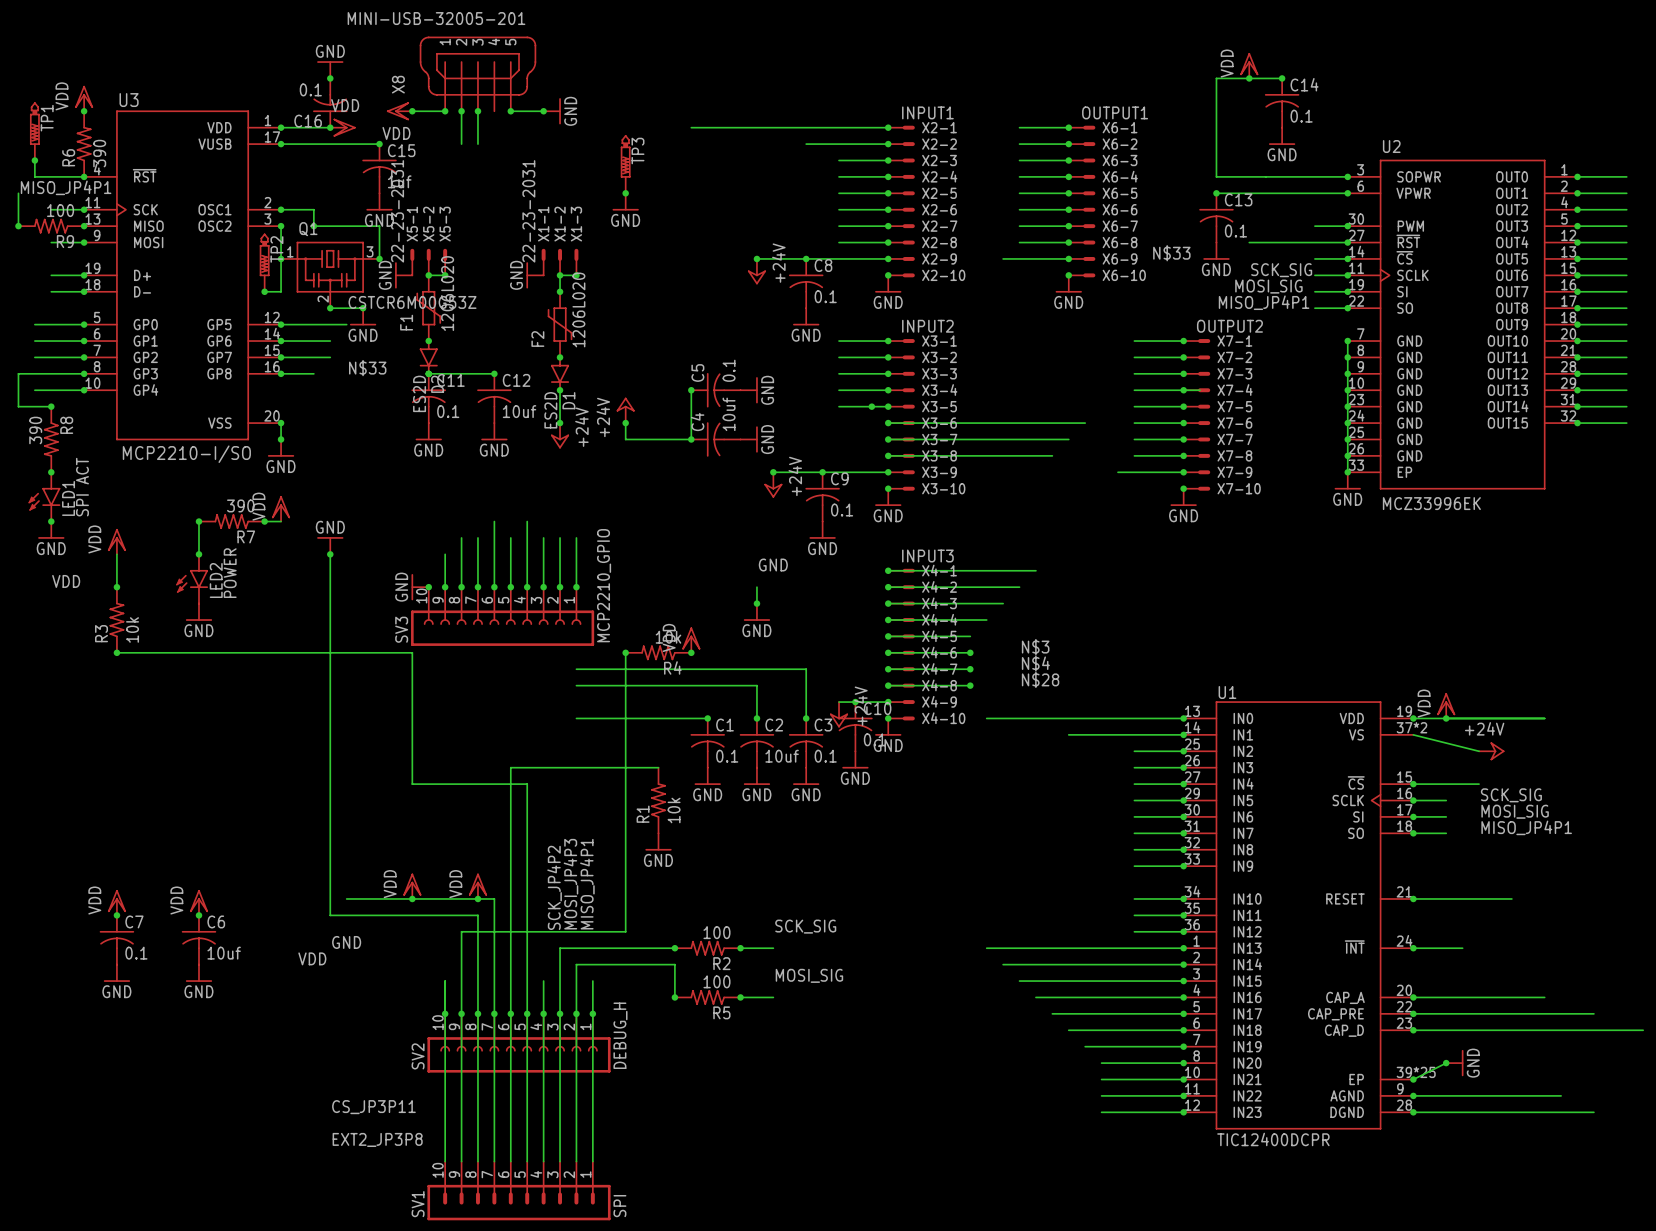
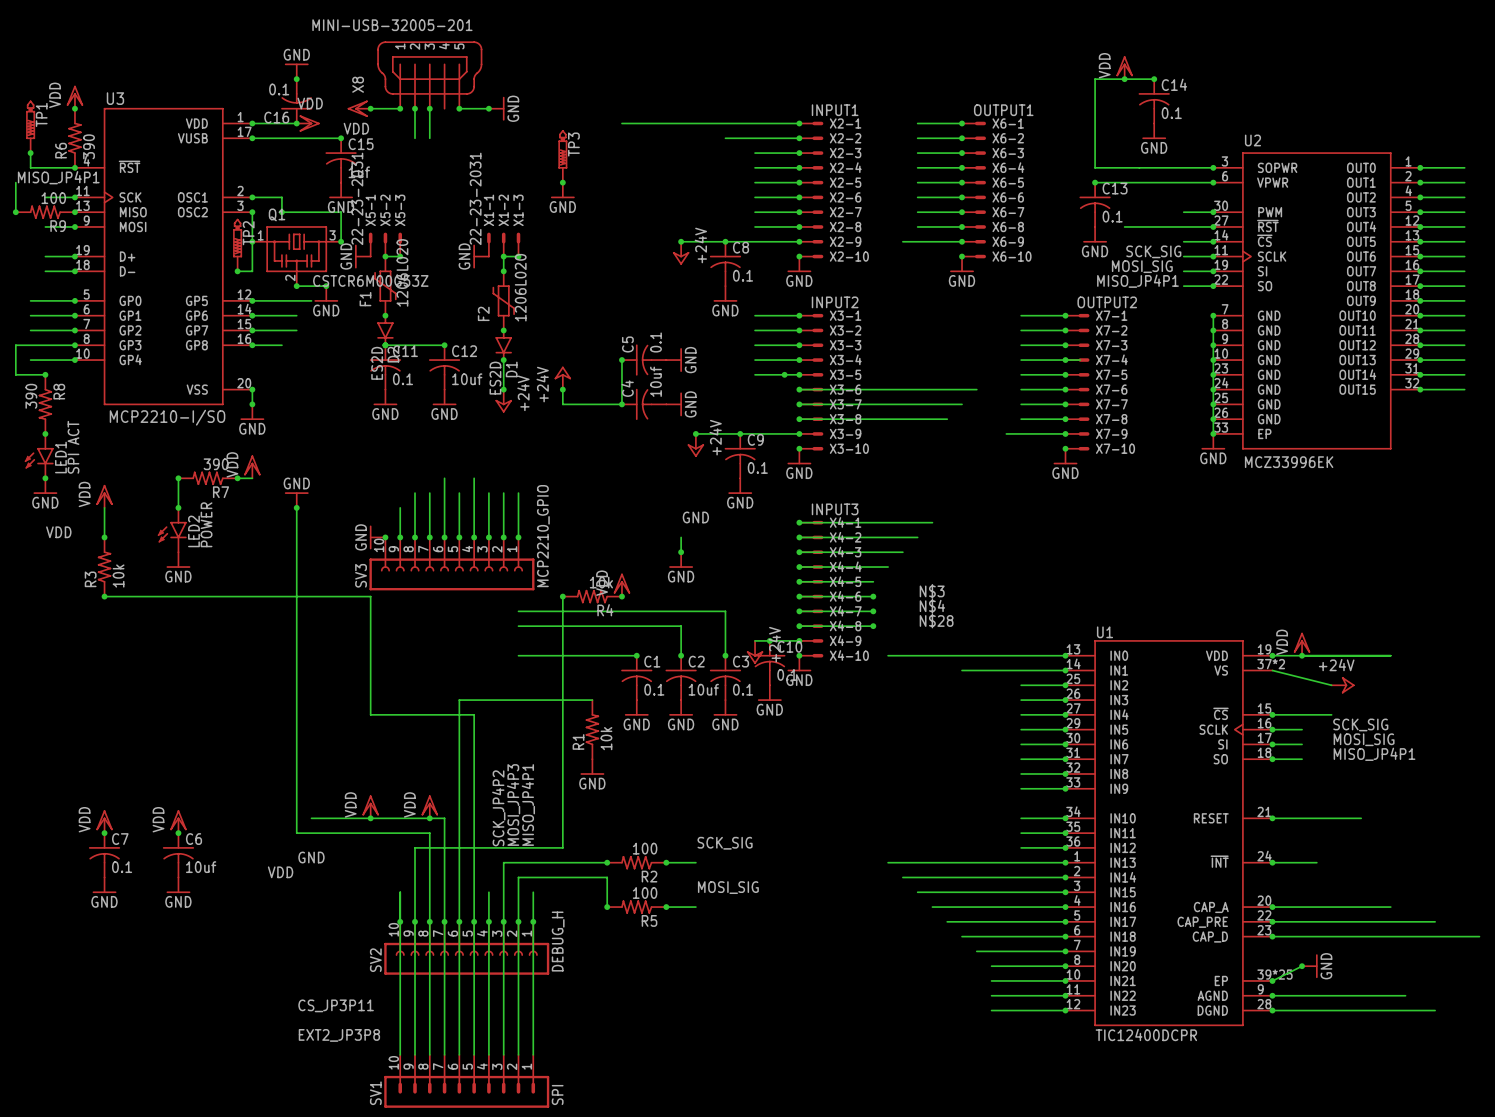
label: N$33 (1171, 253) -> none
label: N$33 (367, 368) -> none

